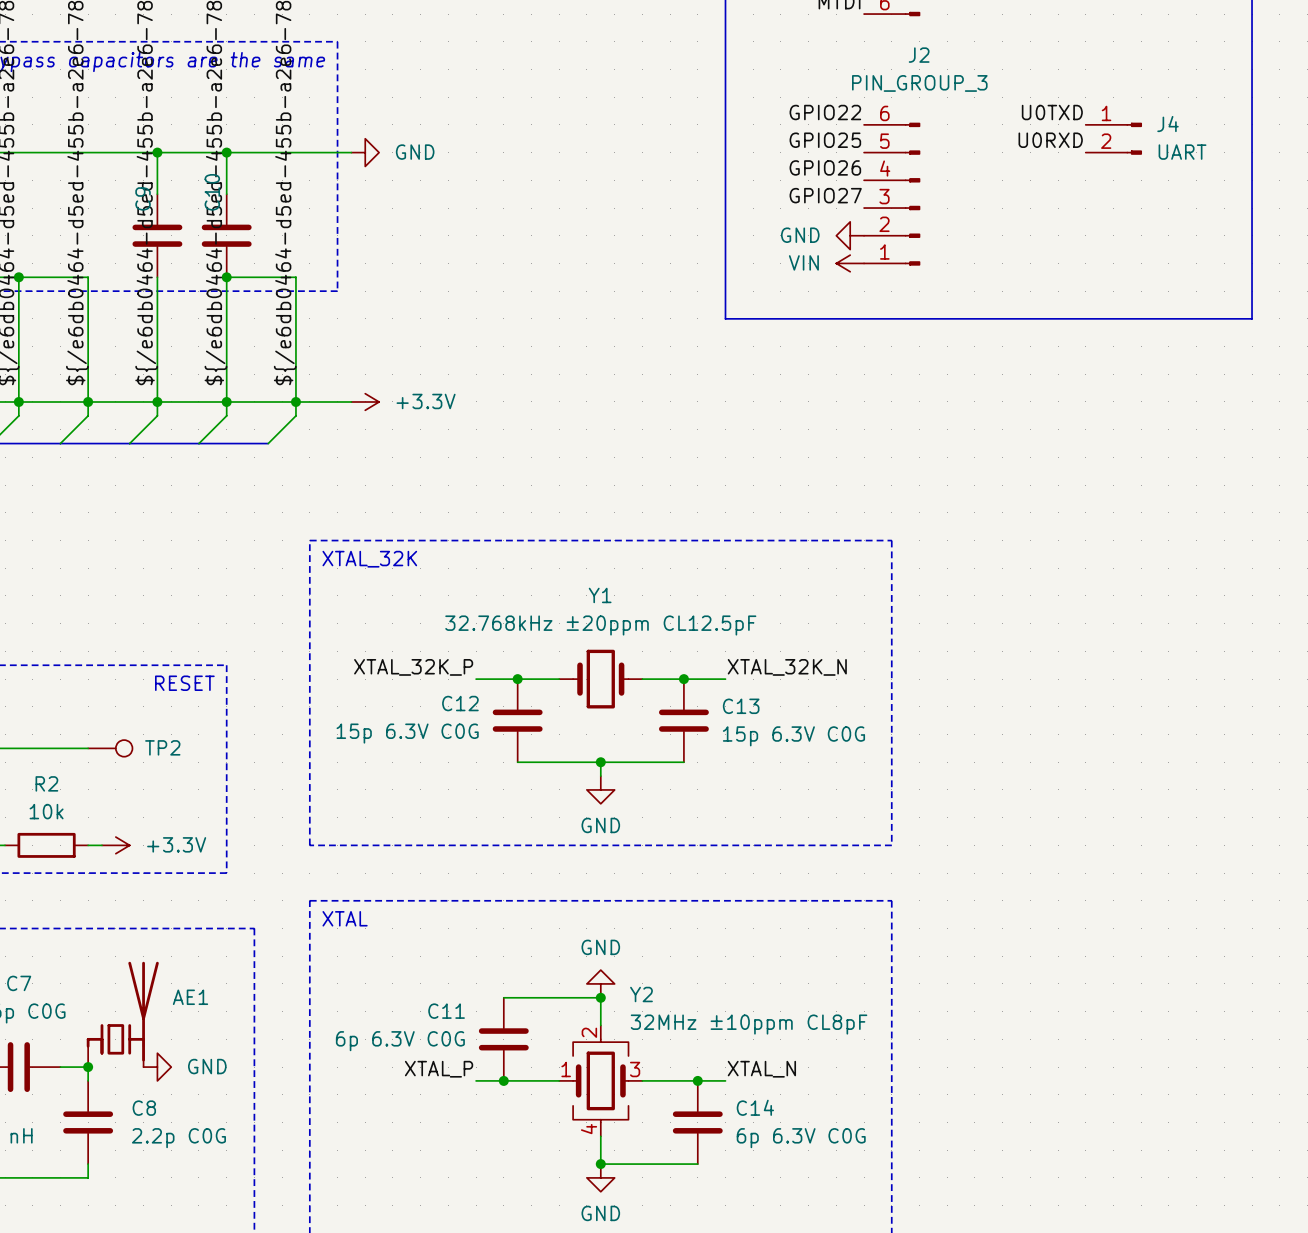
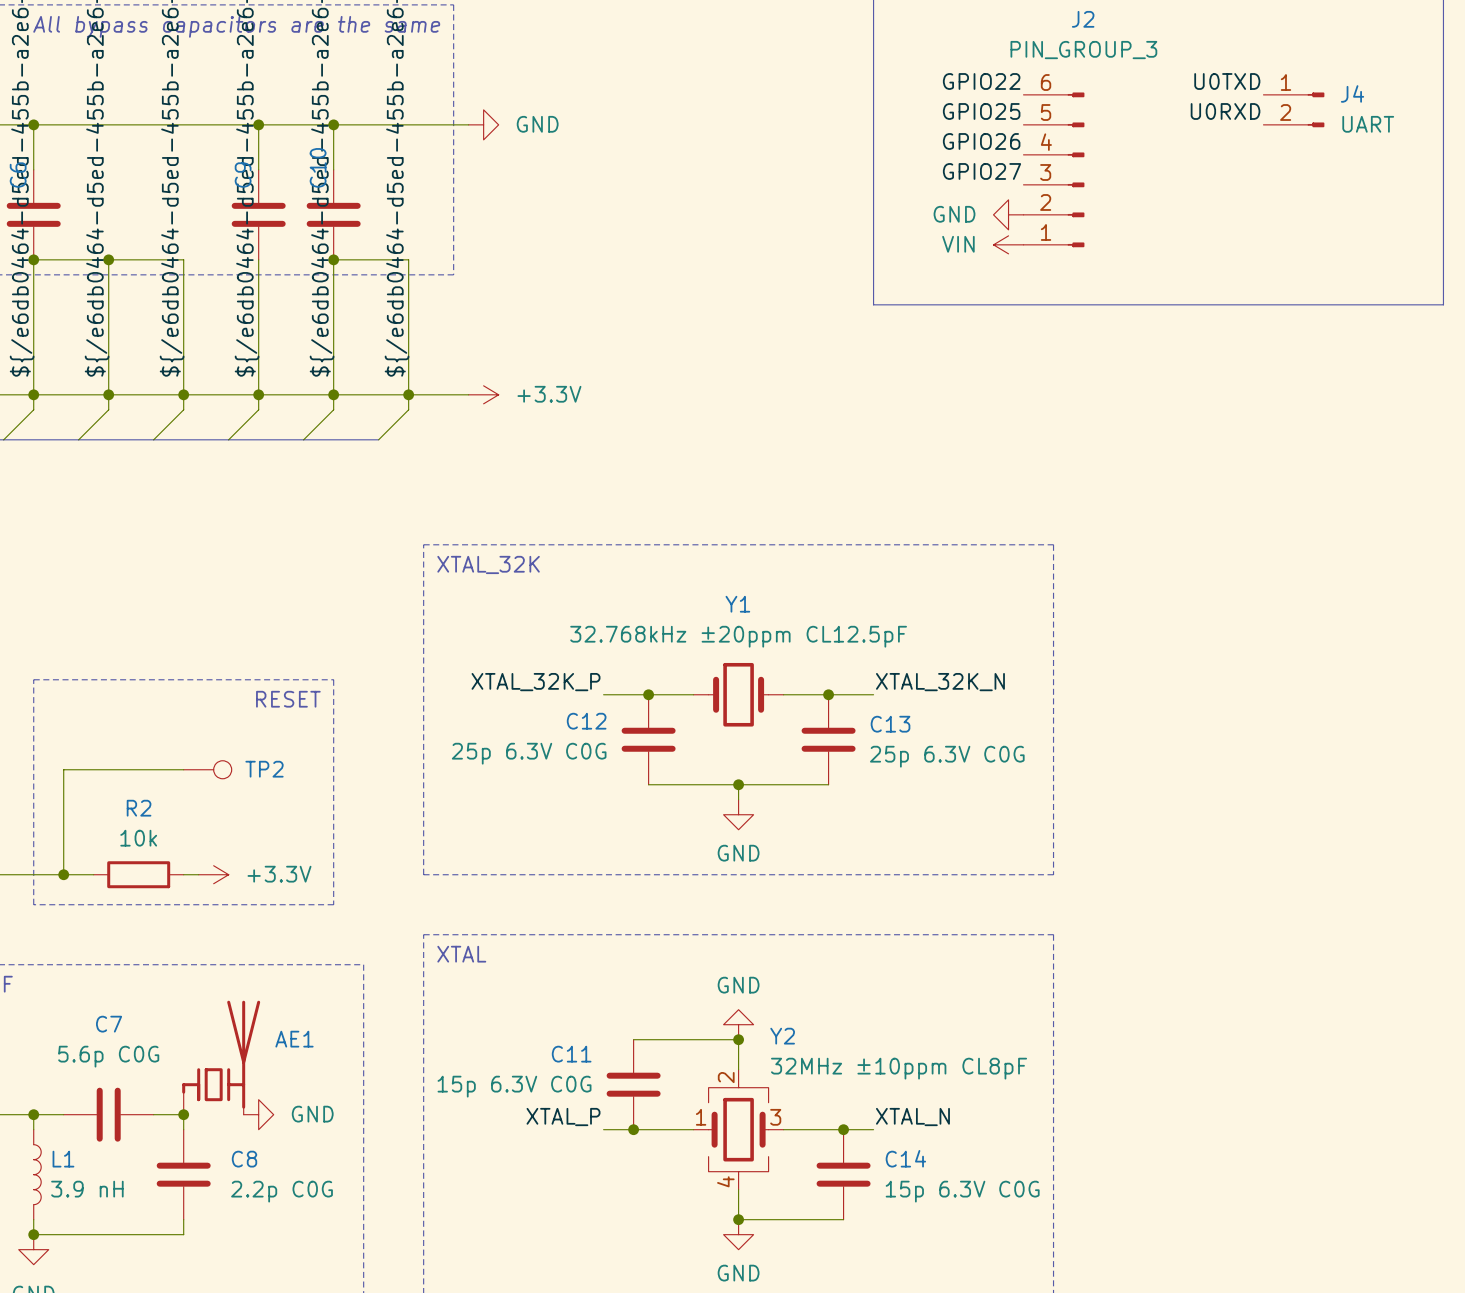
C12 value: 15p 6.3V C0G (407, 733) -> 25p 6.3V C0G (529, 753)
C13 value: 15p 6.3V C0G (793, 736) -> 25p 6.3V C0G (947, 756)
C11 value: 6p 6.3V C0G (400, 1041) -> 15p 6.3V C0G (514, 1086)
C14 value: 6p 6.3V C0G (801, 1138) -> 15p 6.3V C0G (962, 1191)

